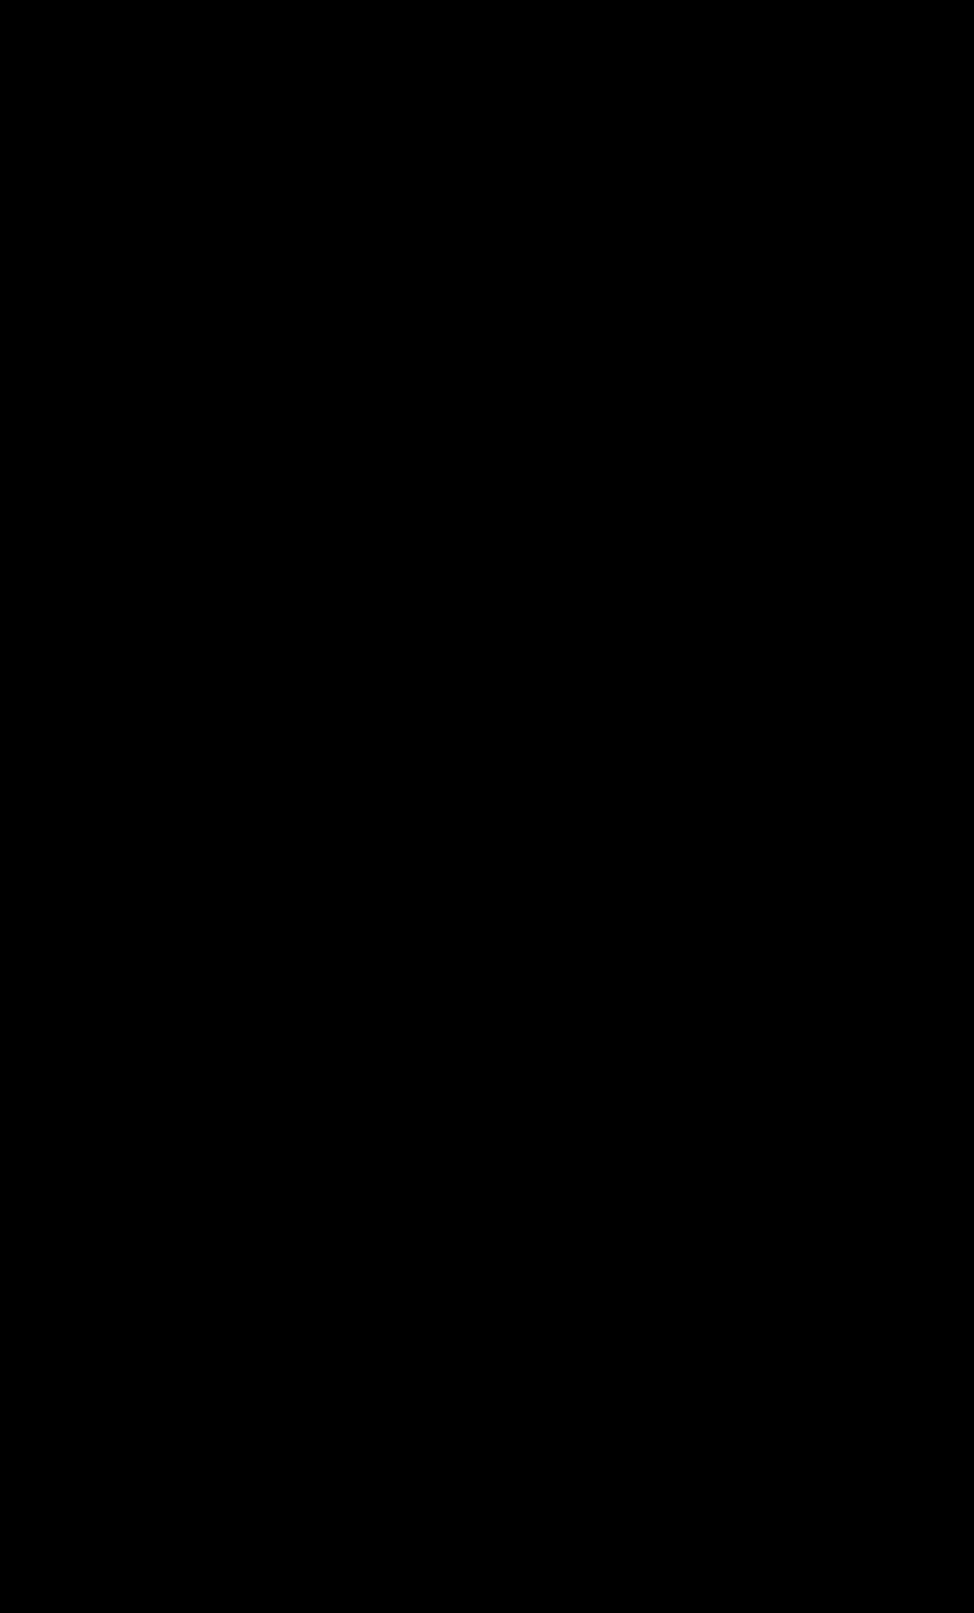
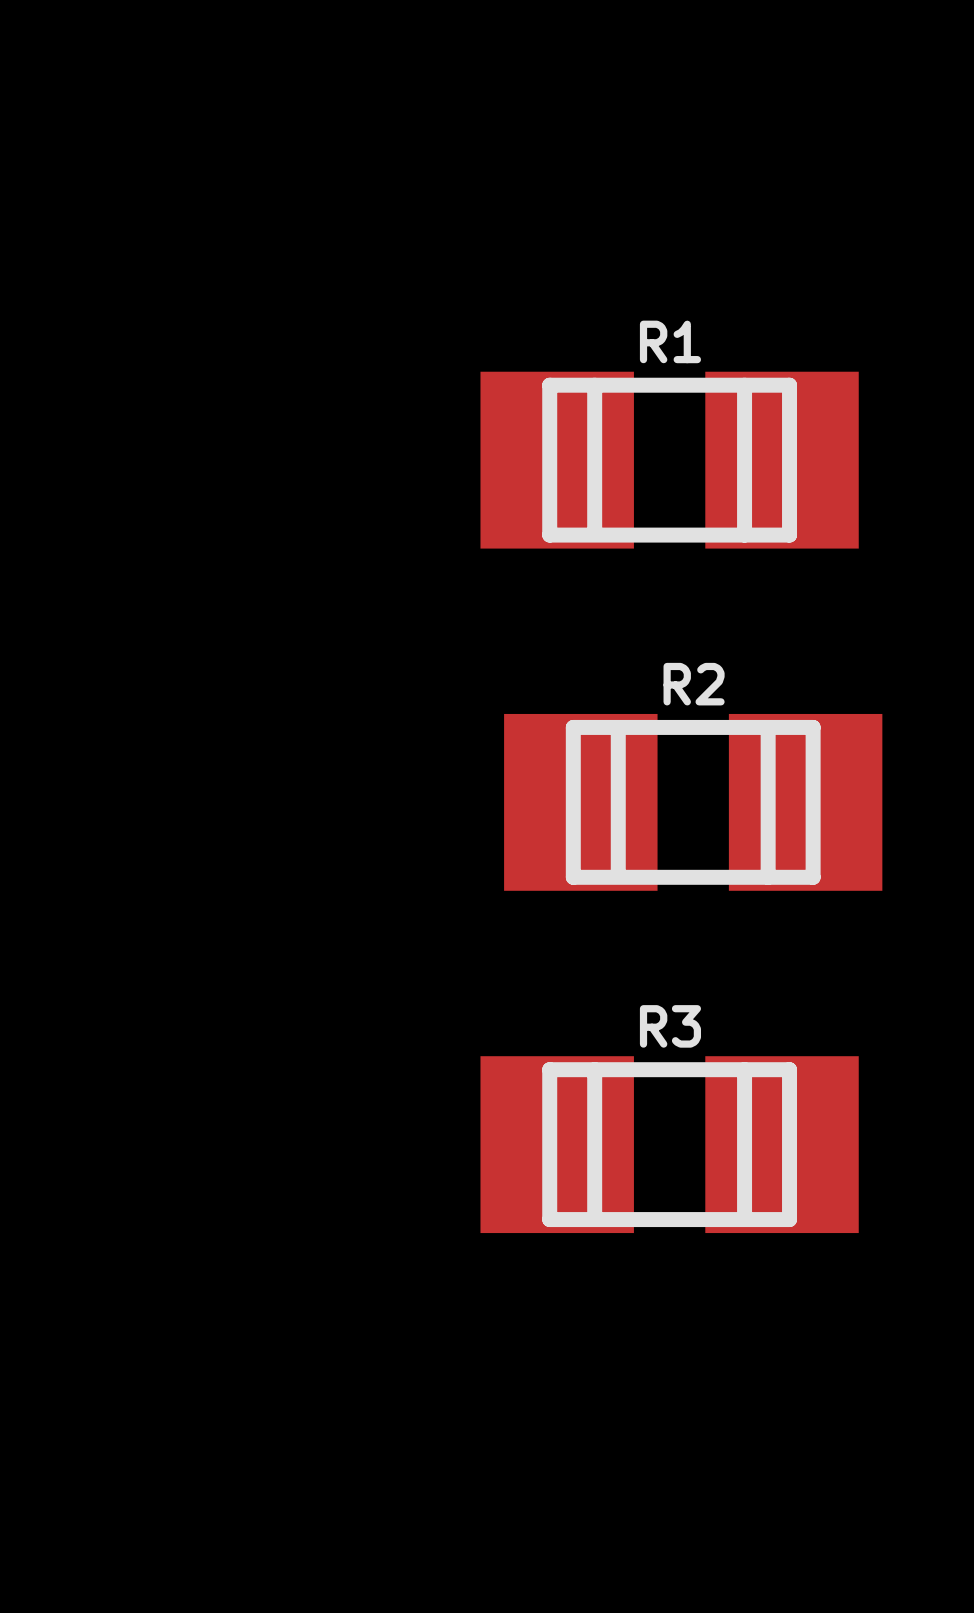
R1: none -> (669, 460)
R2: none -> (693, 802)
R3: none -> (669, 1144)

